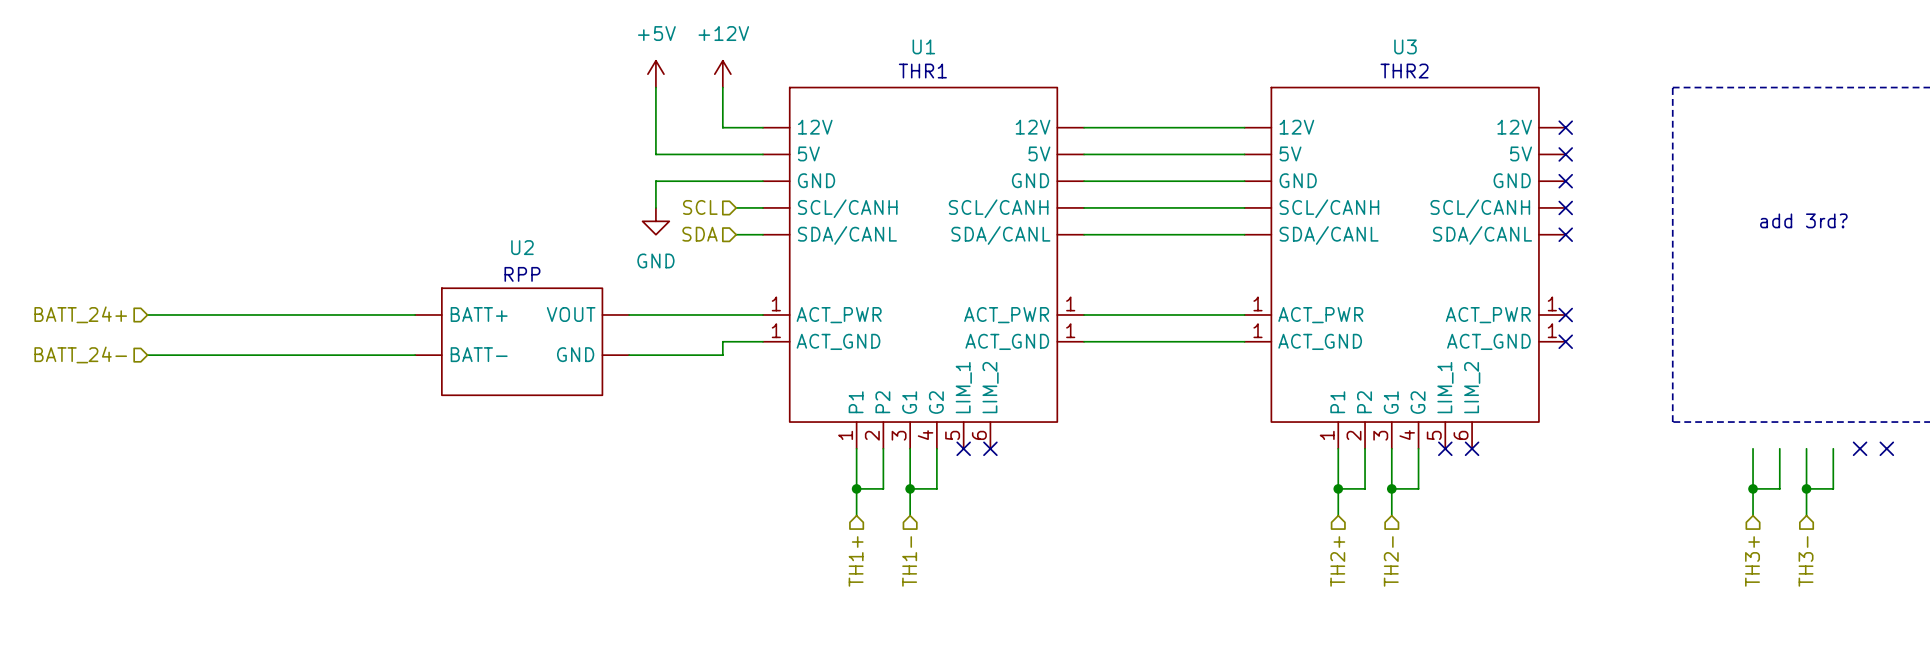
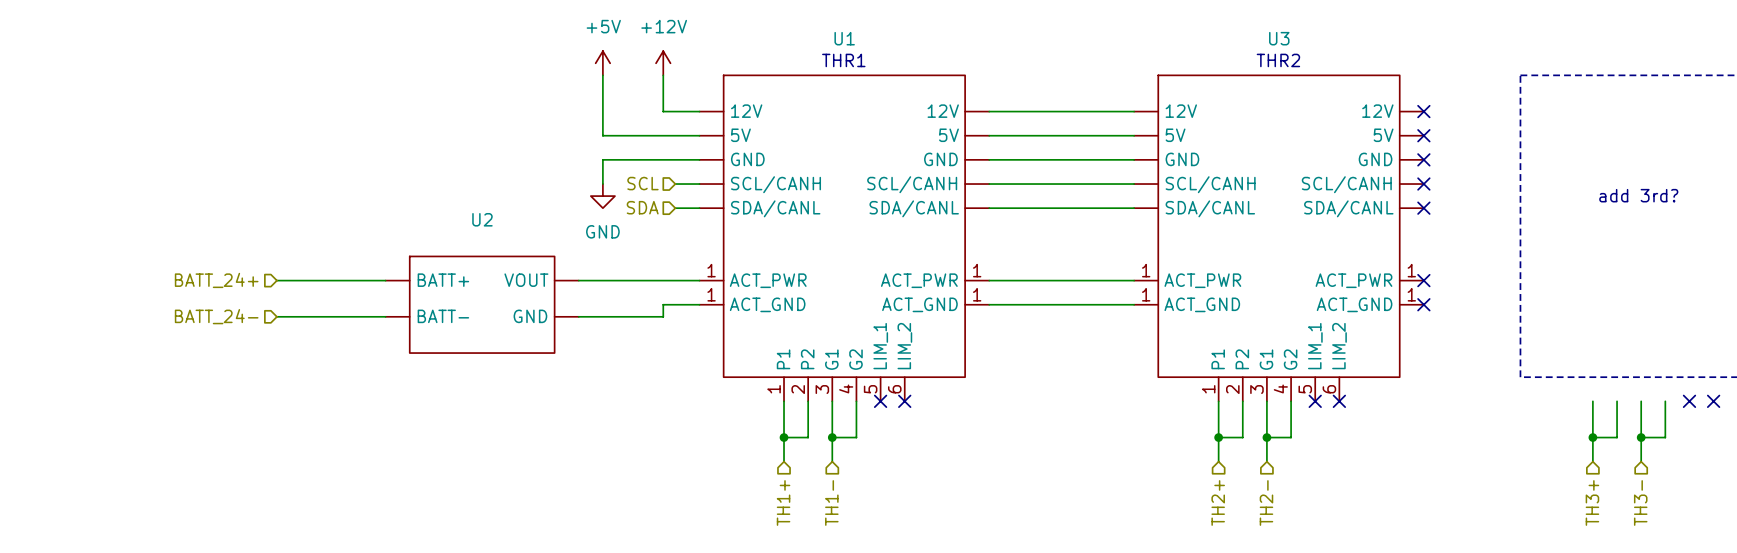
text: RPP (522, 274) -> none
hierarchical label position: BATT_24+ (80, 314) -> BATT_24+ (216, 280)
wire: (147, 314) (294, 314) -> none
hierarchical label position: BATT_24- (80, 354) -> BATT_24- (216, 316)
wire: (147, 355) (294, 355) -> none

